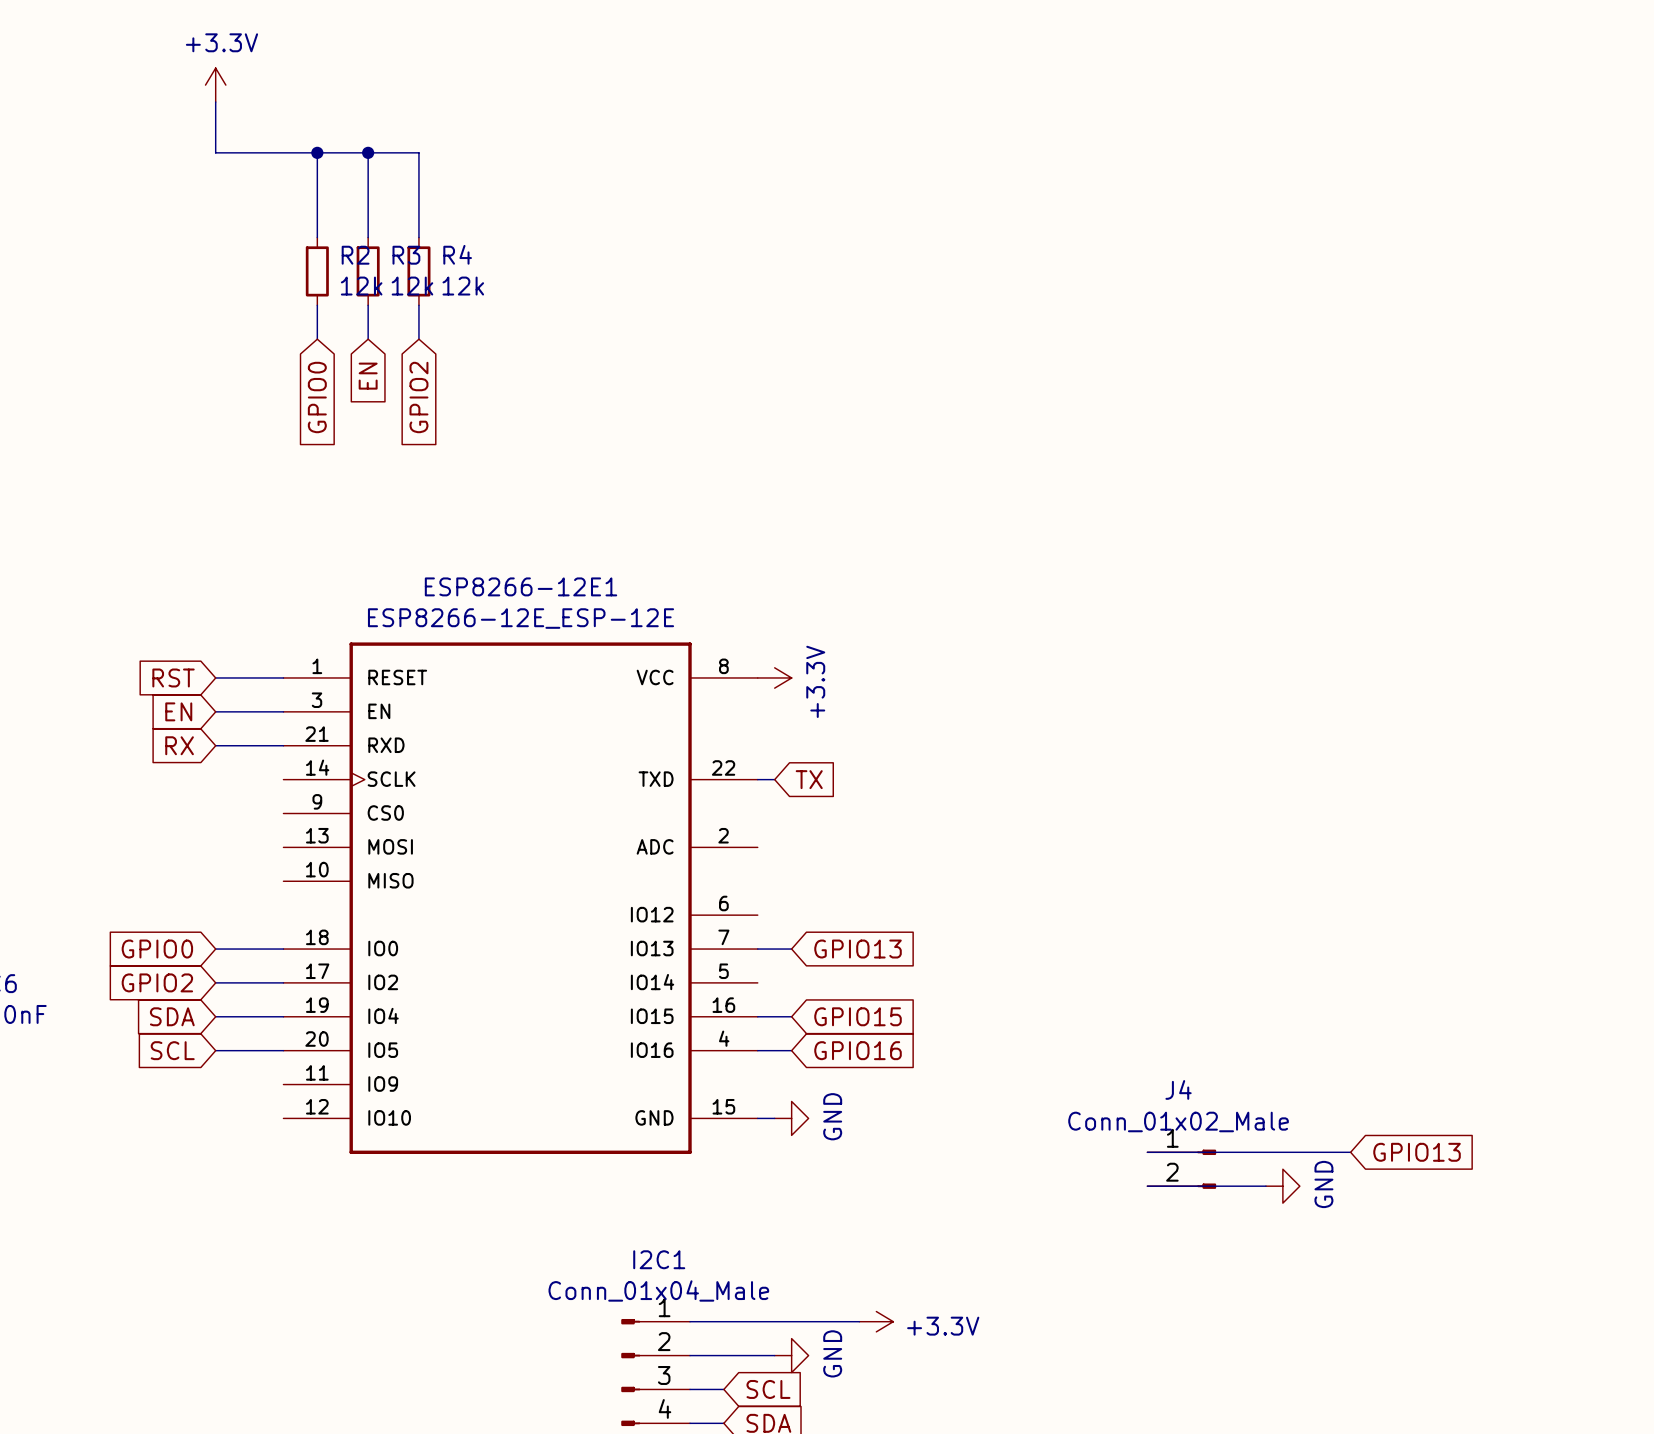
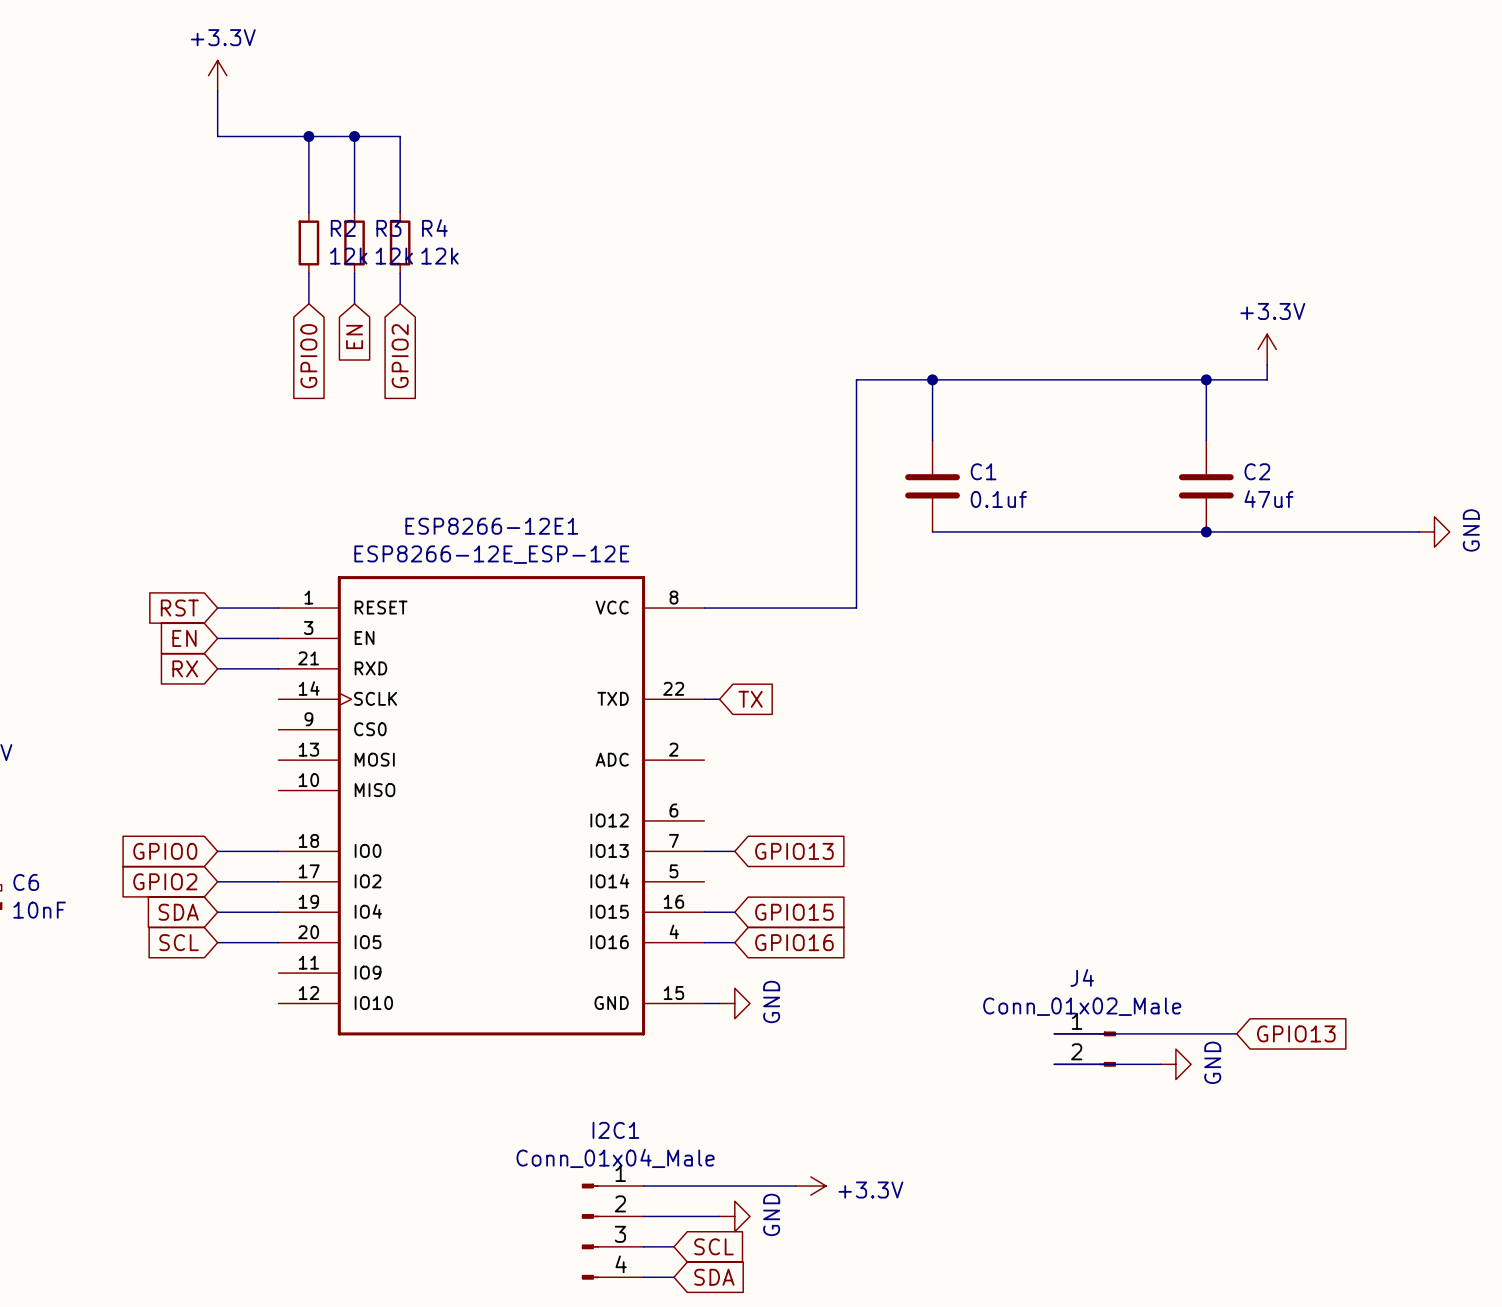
power symbol: none -> +3.3V (1267, 349)
wire: none -> (1267, 364) (1267, 379) (856, 379) (856, 608) (704, 608)
wire: none -> (932, 379) (932, 440)
junction: none -> (932, 379)
wire: none -> (1206, 379) (1206, 440)
junction: none -> (1206, 379)
C1: none -> 0.1uf (932, 486)
C2: none -> 47uf (1206, 486)
wire: none -> (932, 531) (1419, 531)
junction: none -> (1206, 531)
power symbol: none -> GND (1434, 531)
power symbol: +3.3V (774, 677) -> none

